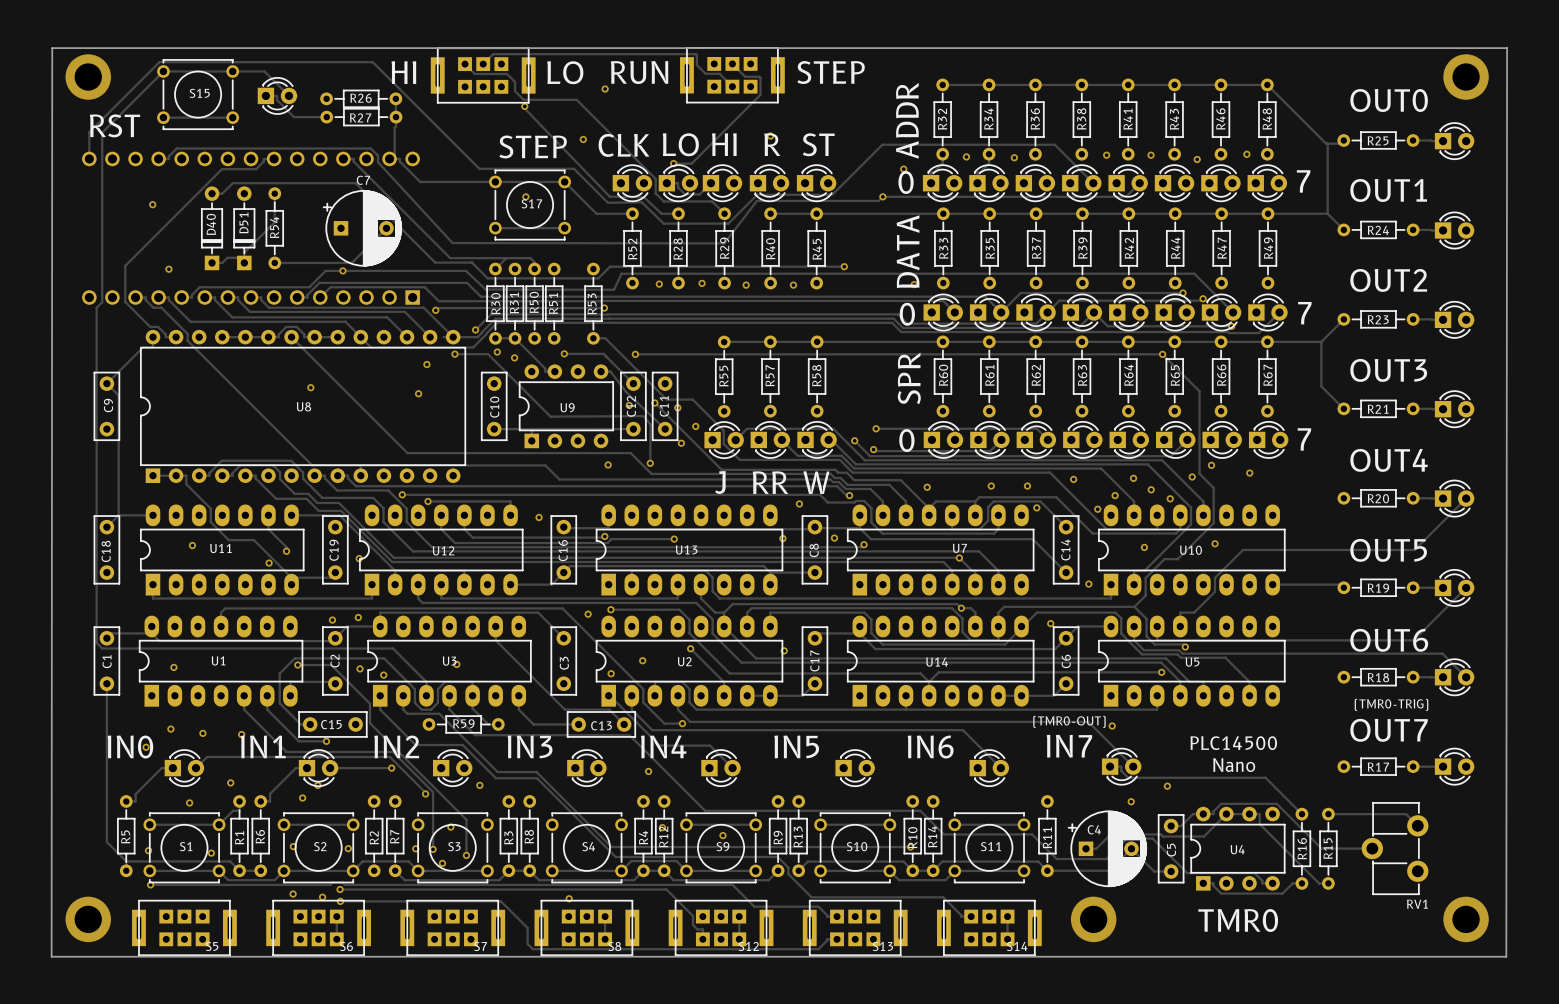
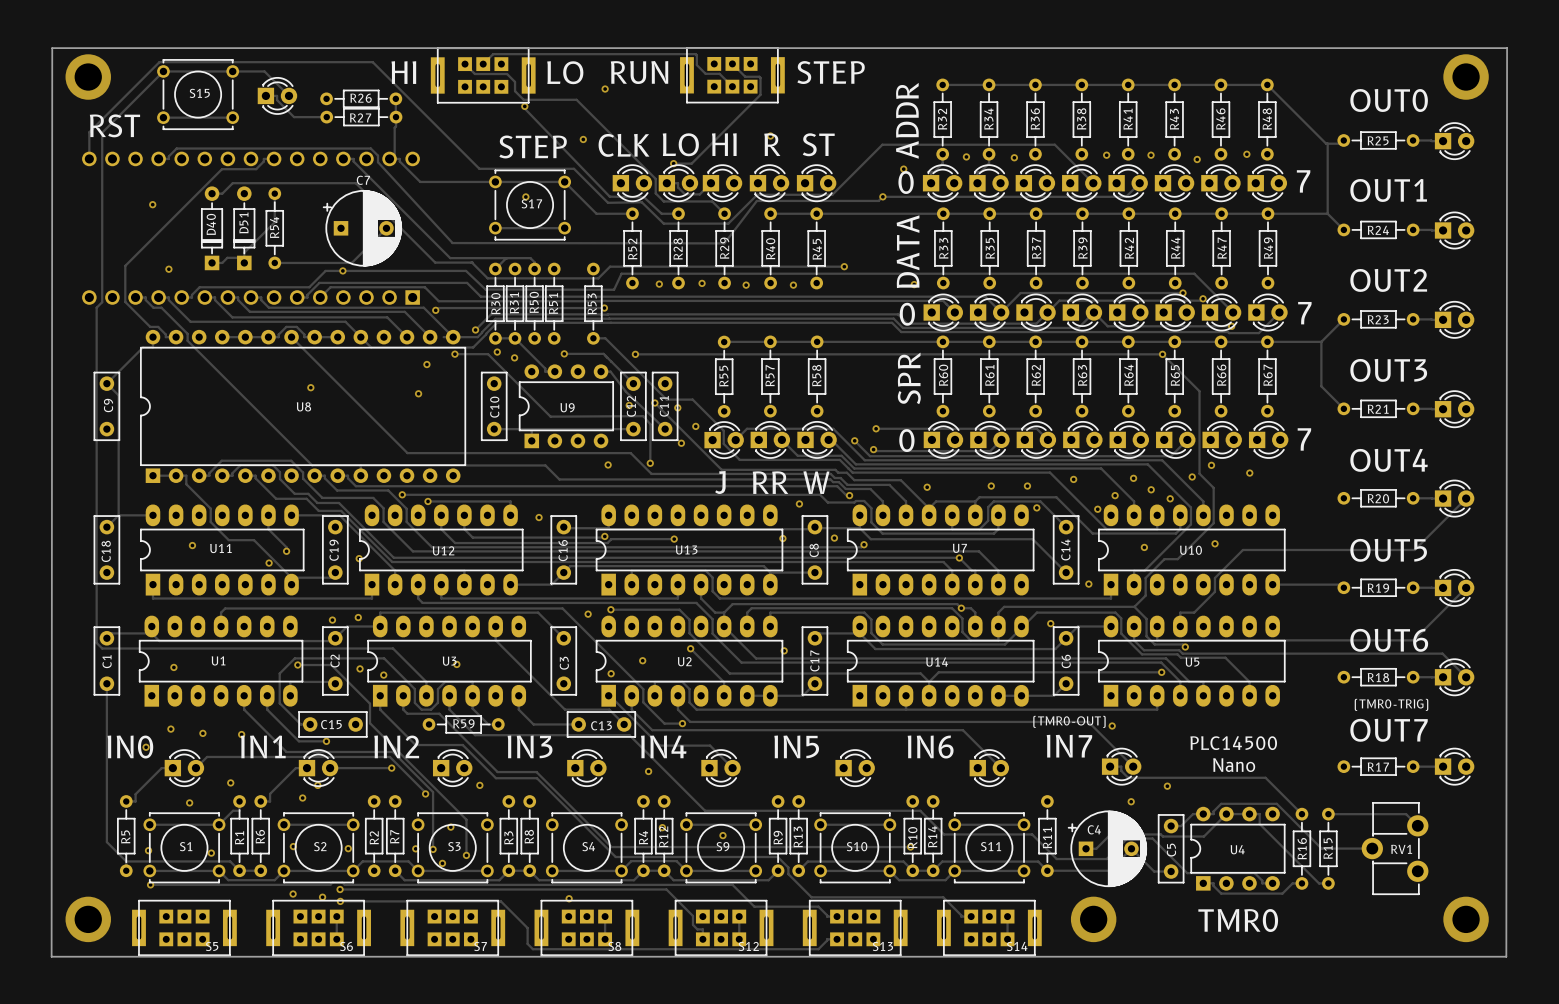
RV1 name position: RV1 (1417, 904) -> RV1 (1401, 849)

